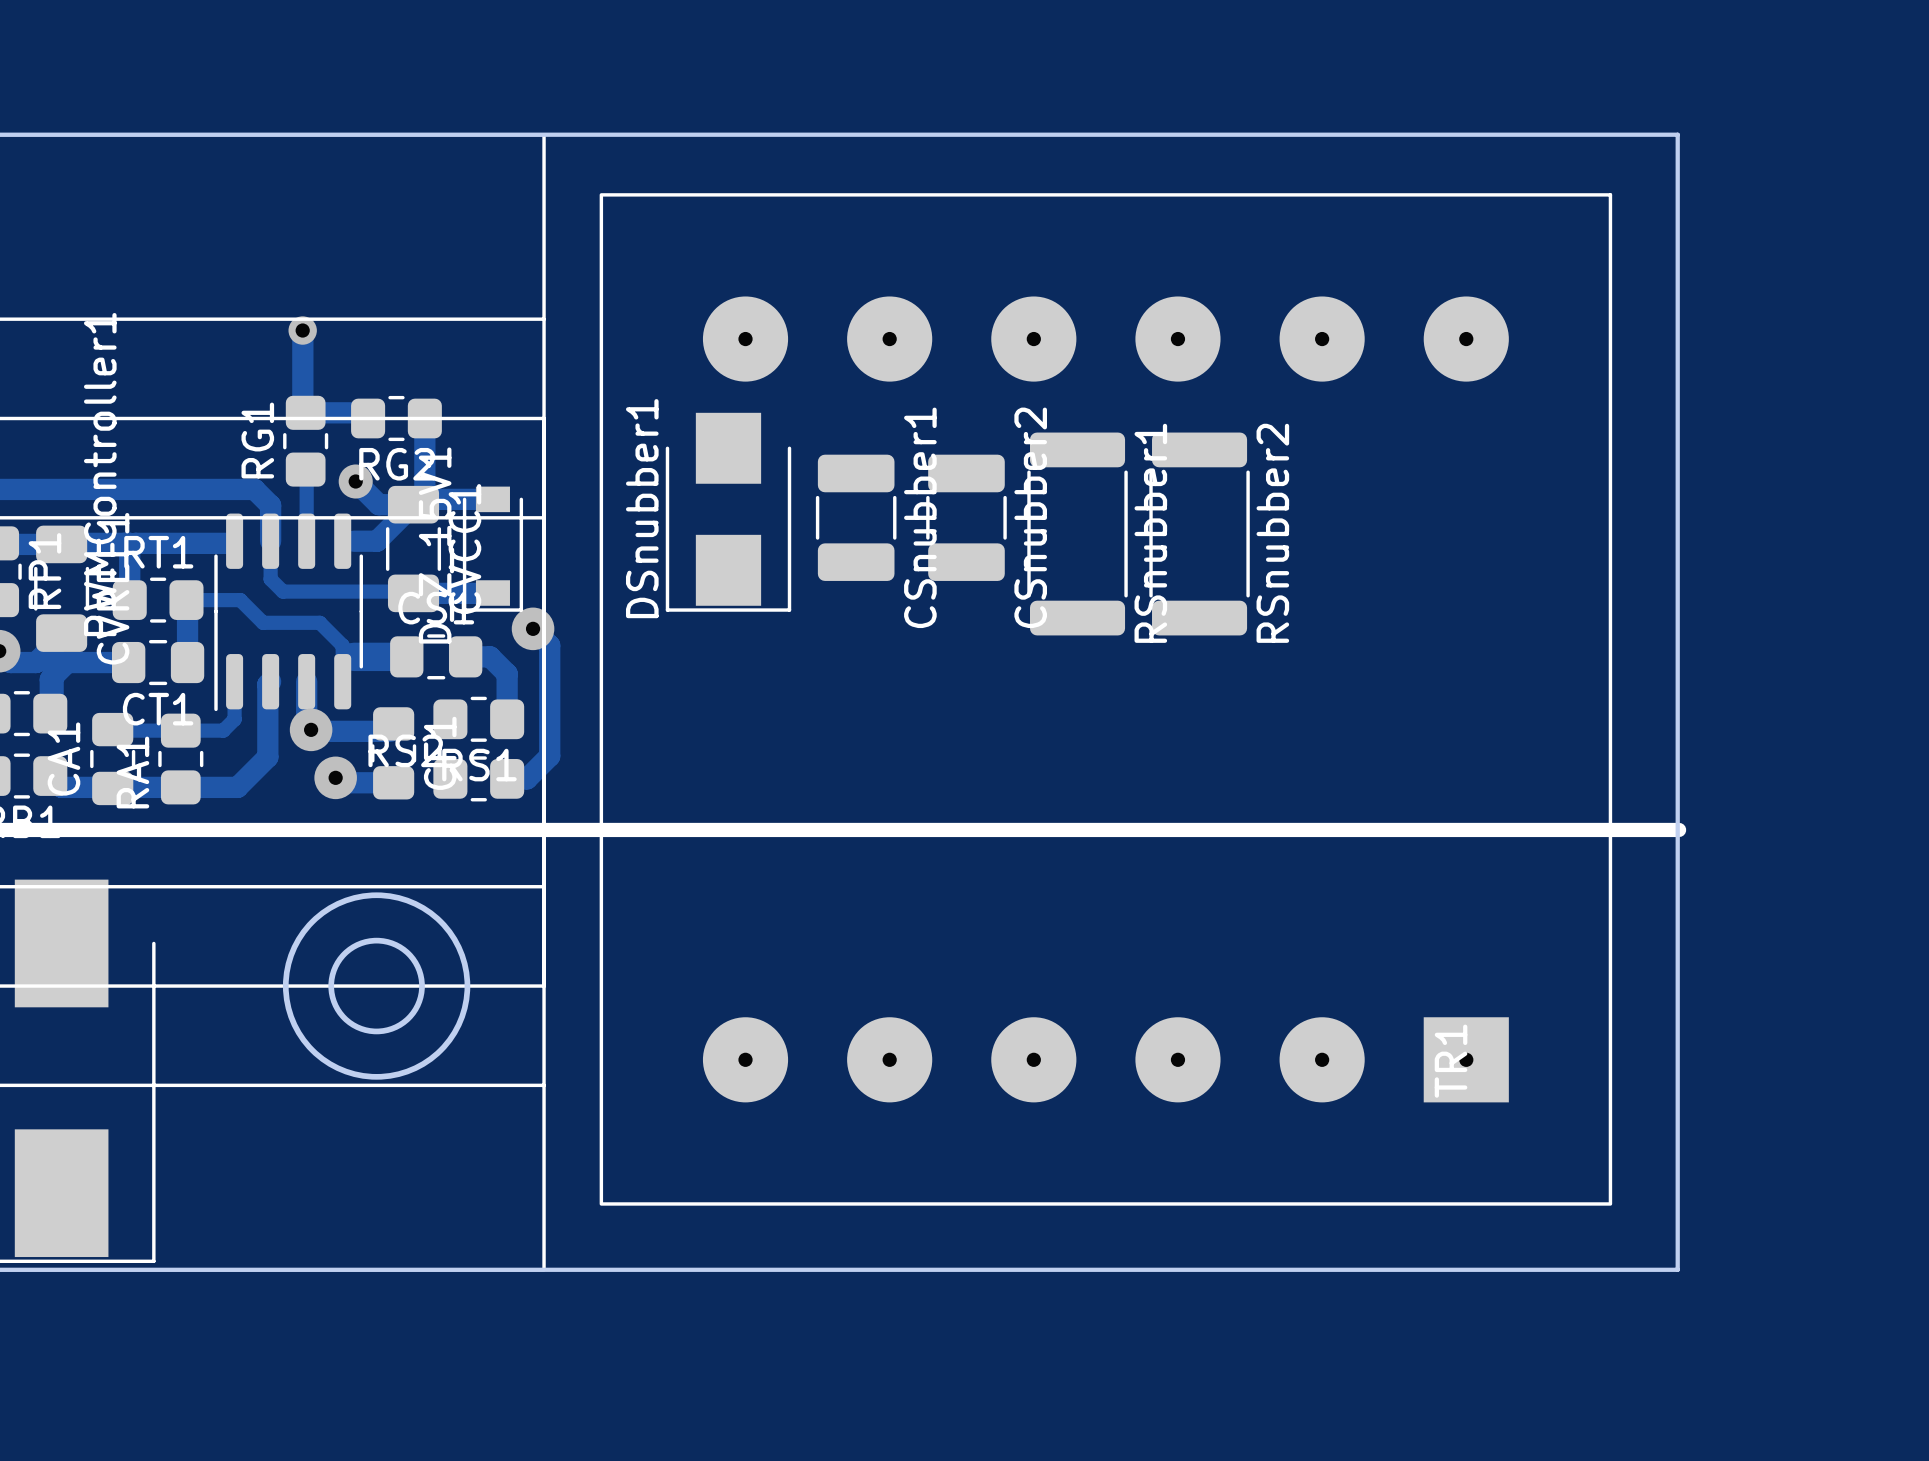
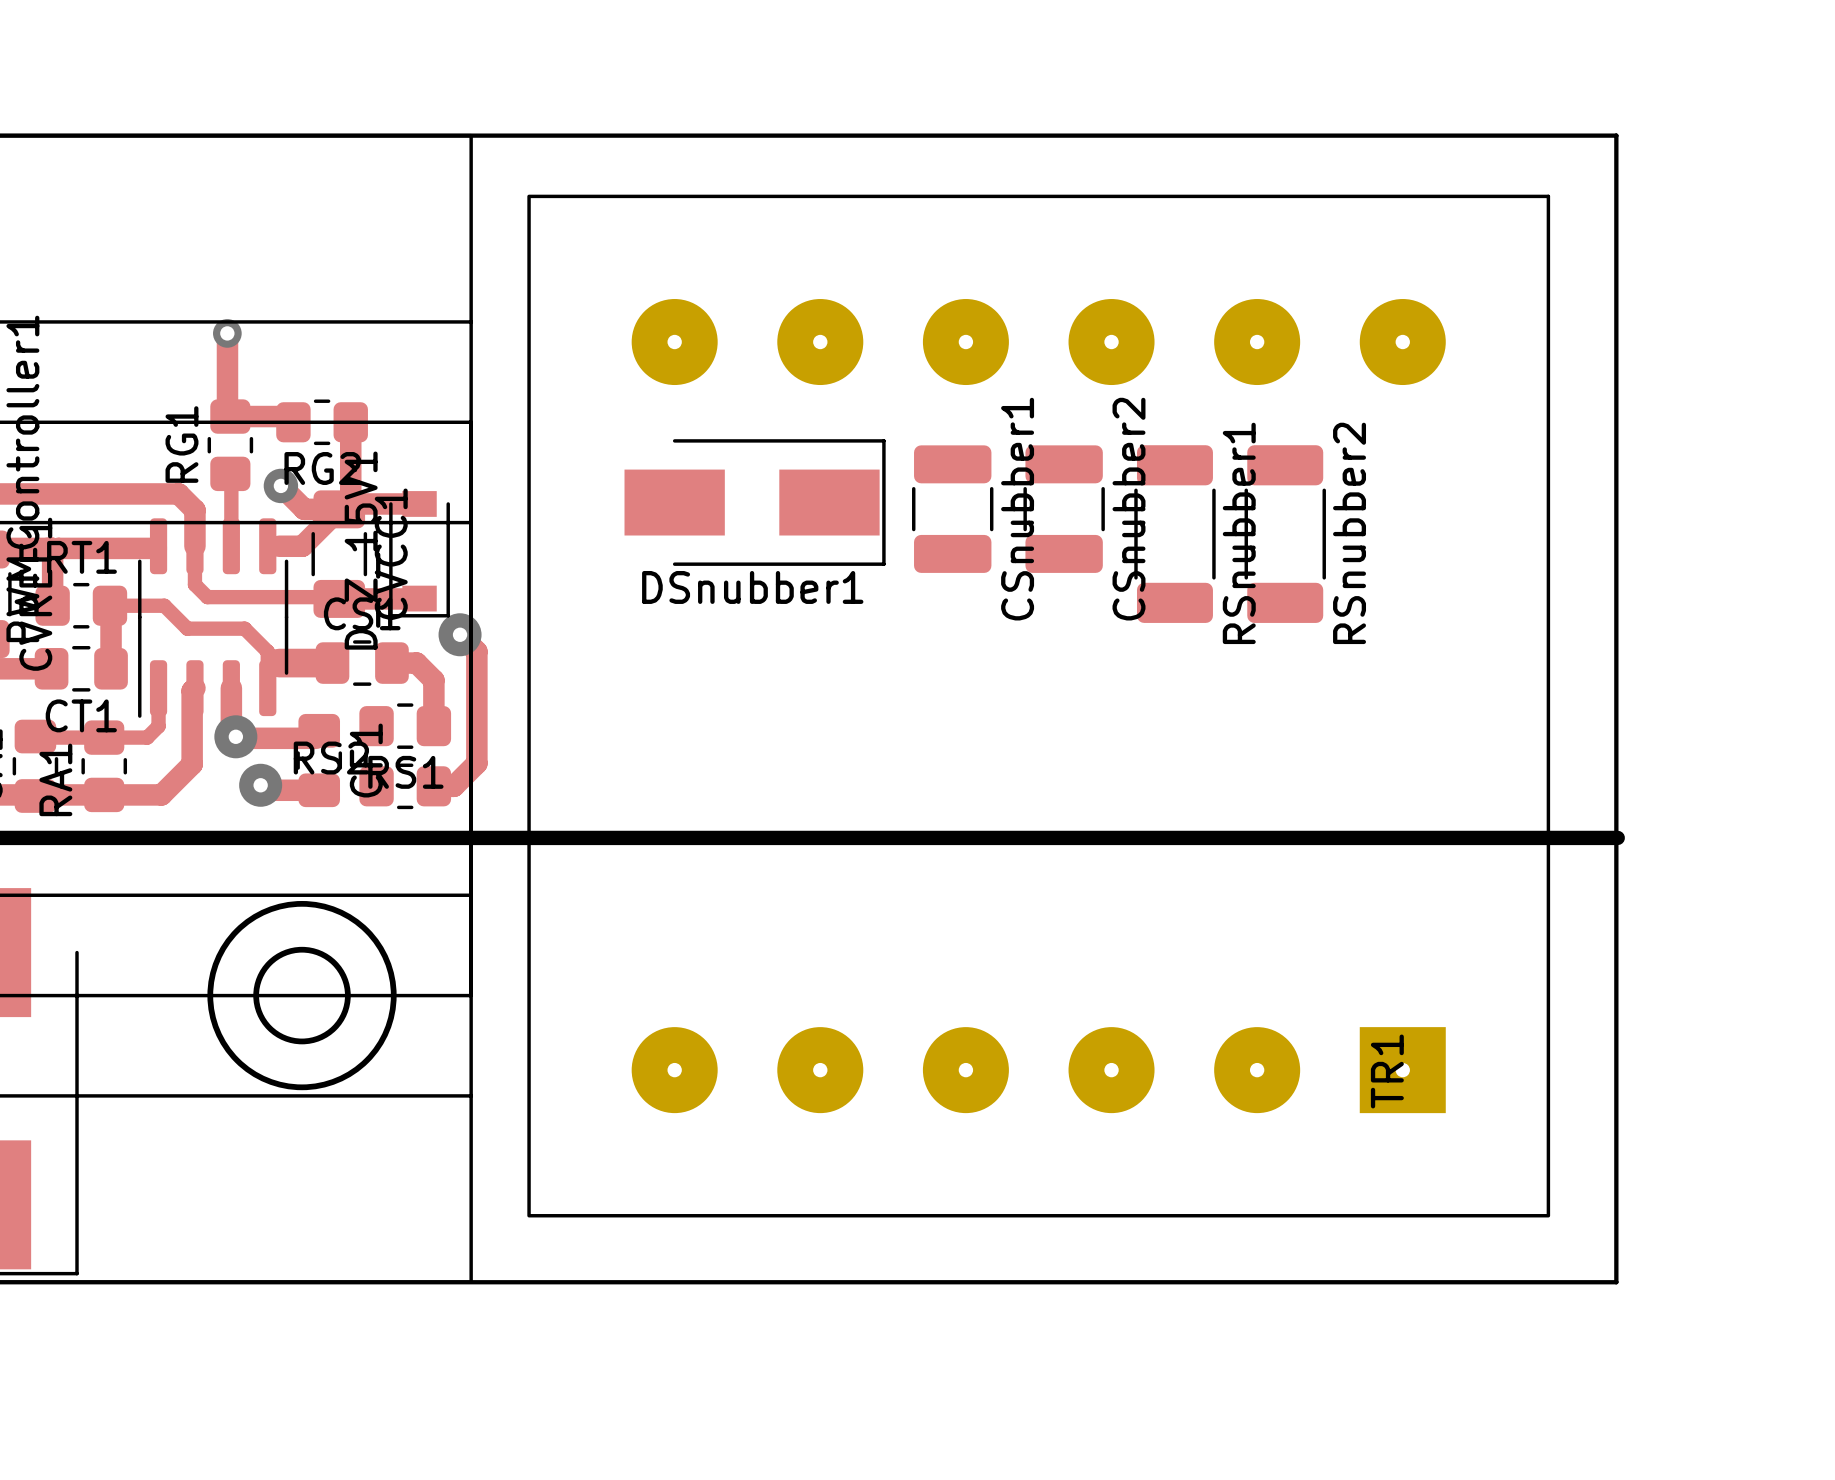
DSnubber1 footprint: [665, 412, 792, 612] -> [624, 439, 886, 566]
RSnubber1 footprint: [1027, 432, 1128, 636] -> [1134, 445, 1216, 623]
RSnubber2 footprint: [1149, 432, 1250, 636] -> [1244, 445, 1326, 623]
DSnubber1 name position: DSnubber1 (642, 508) -> DSnubber1 (752, 587)
CSnubber1 position: (856, 517) -> (952, 509)
CSnubber2 position: (966, 517) -> (1064, 509)

